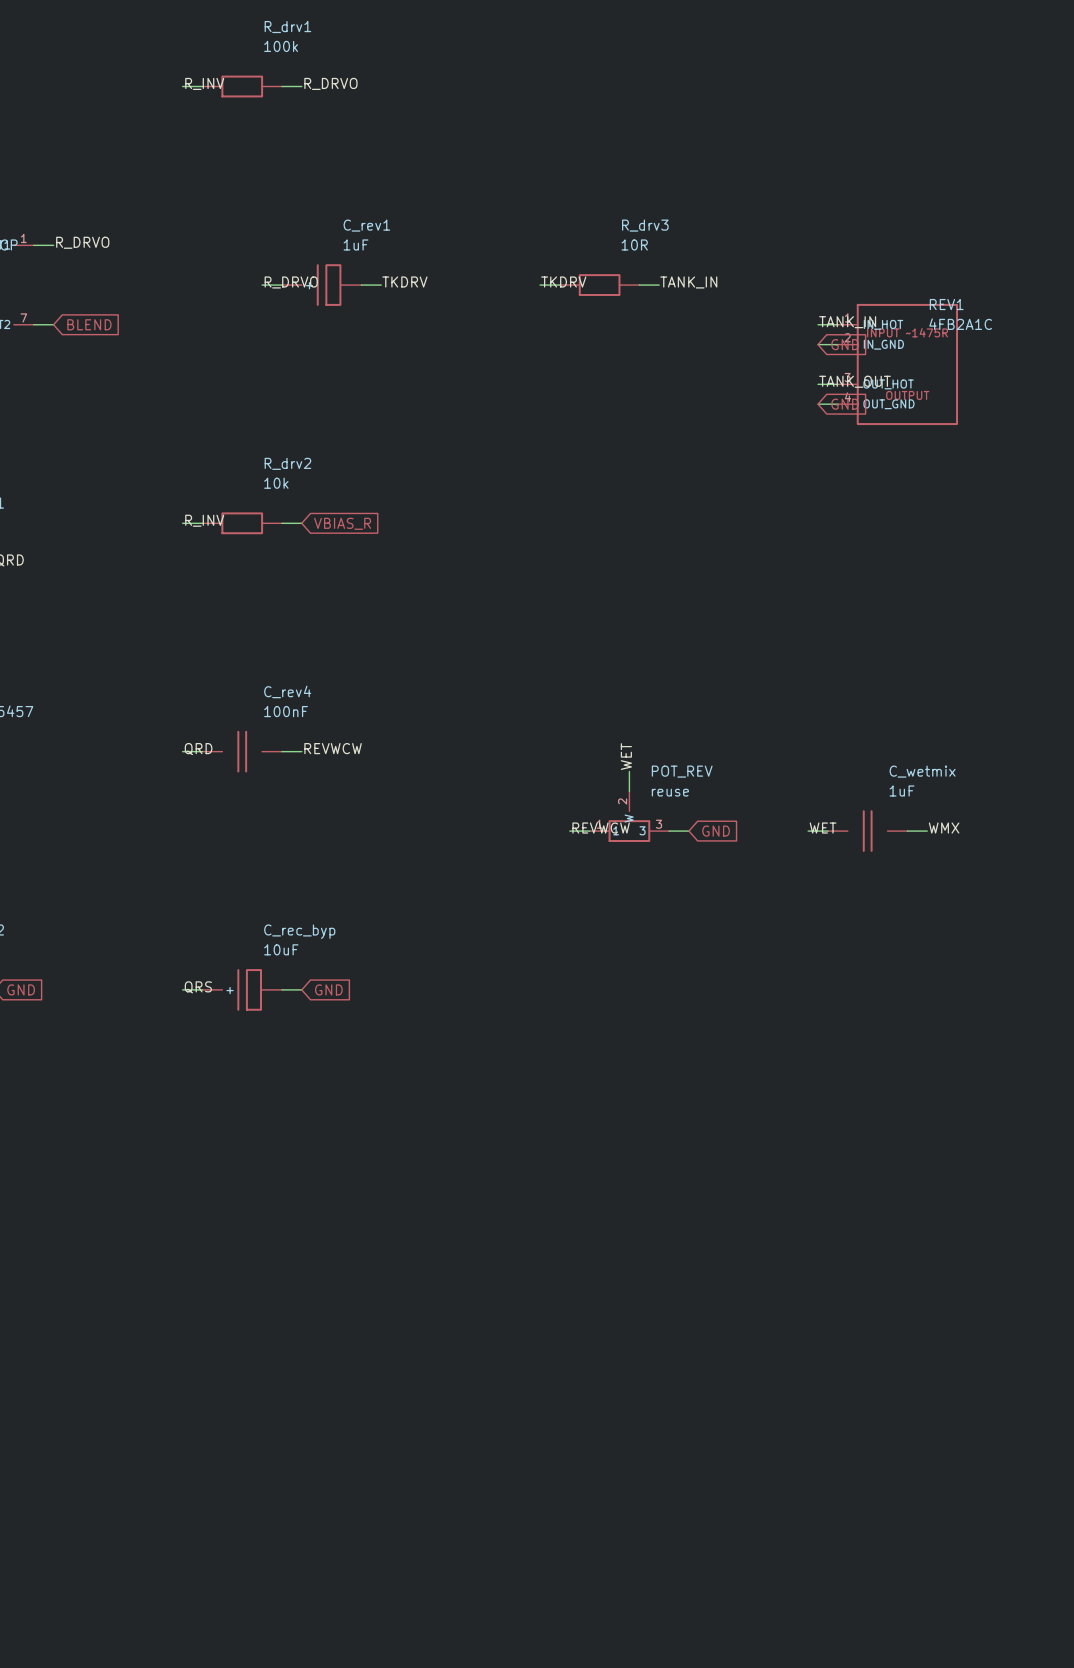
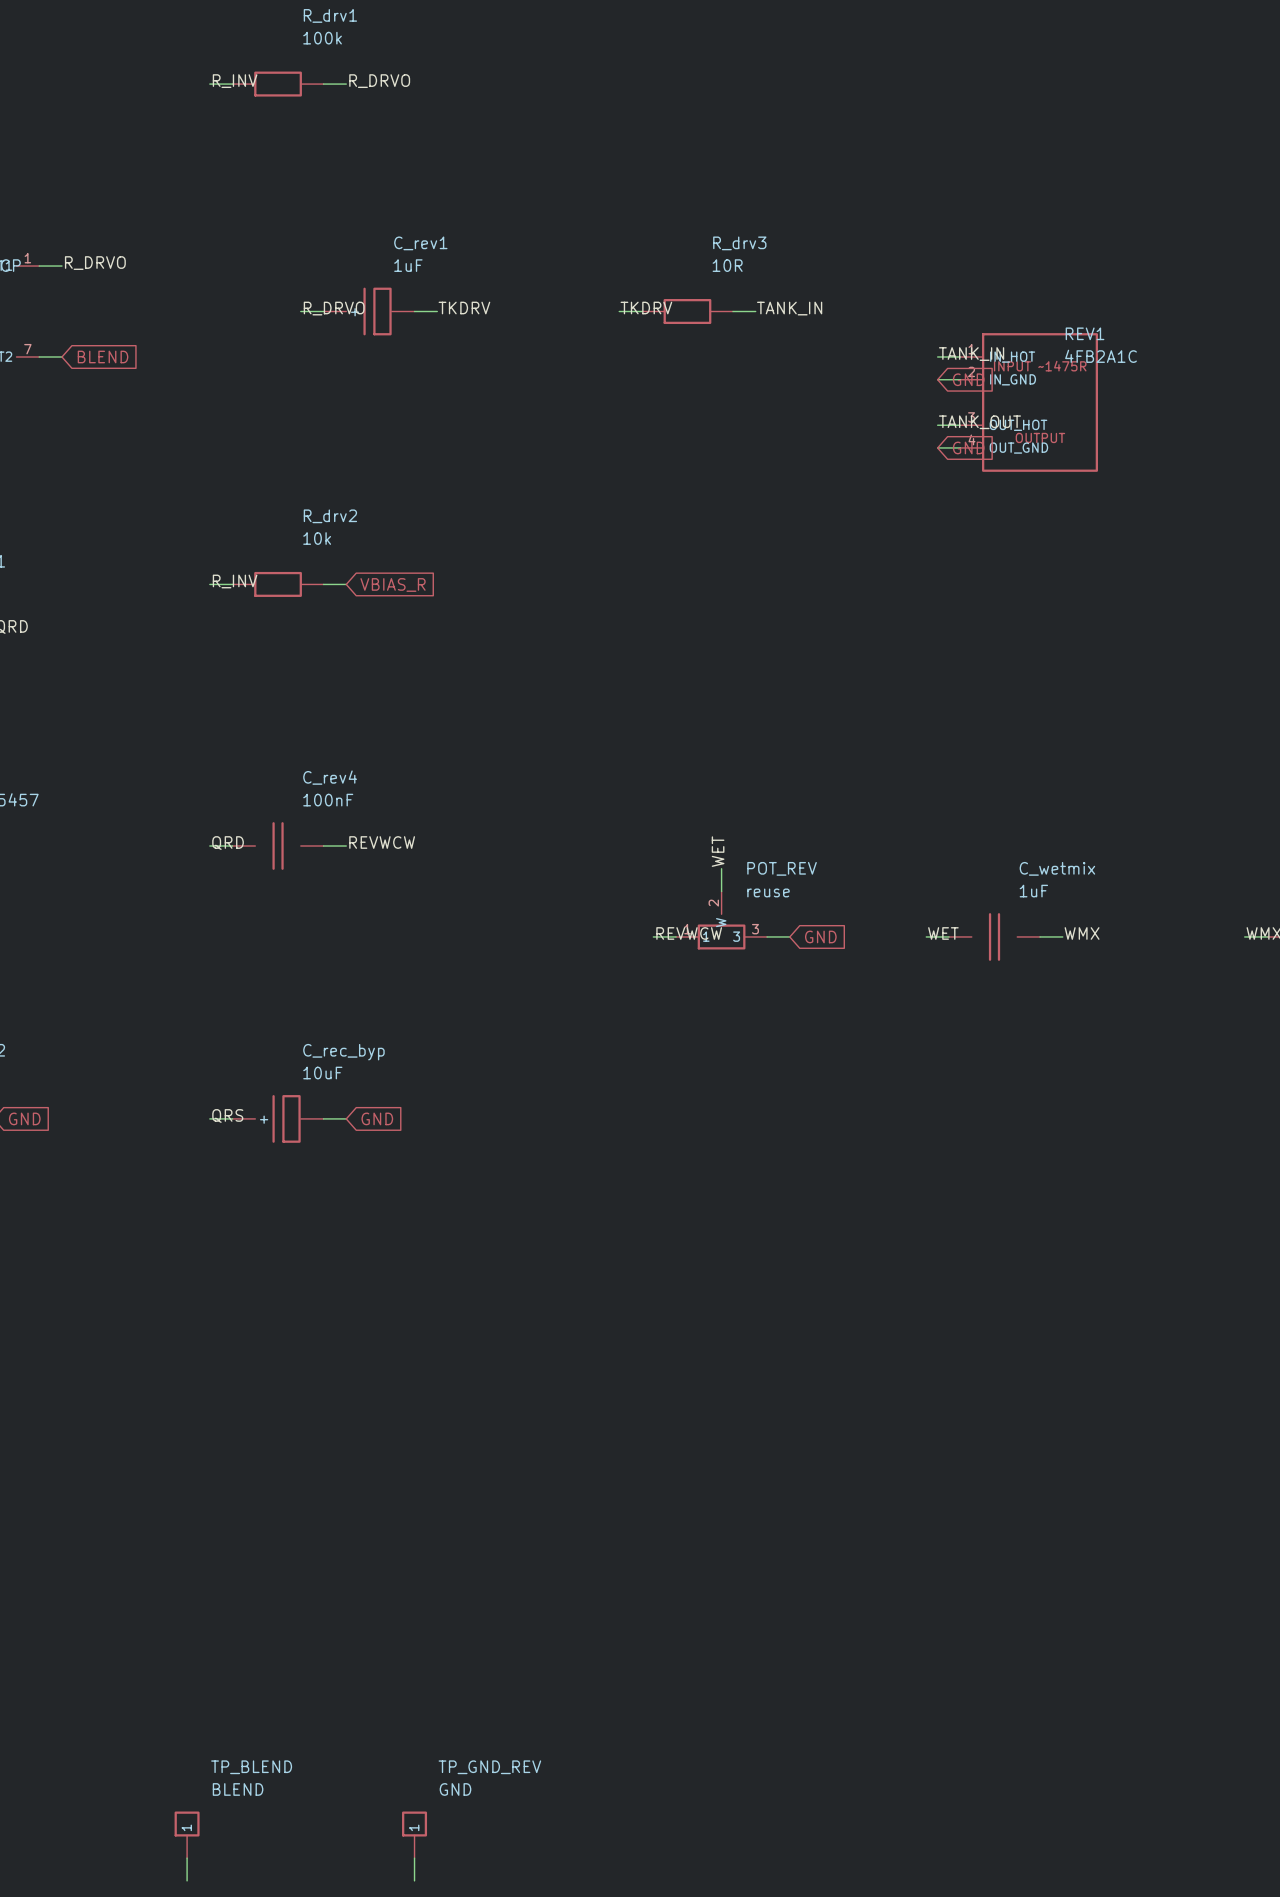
TP_BLEND: none -> BLEND (187, 1834)
TP_GND_REV: none -> GND (414, 1834)
wire: none -> (187, 1858) (187, 1880)
wire: none -> (414, 1858) (414, 1880)

